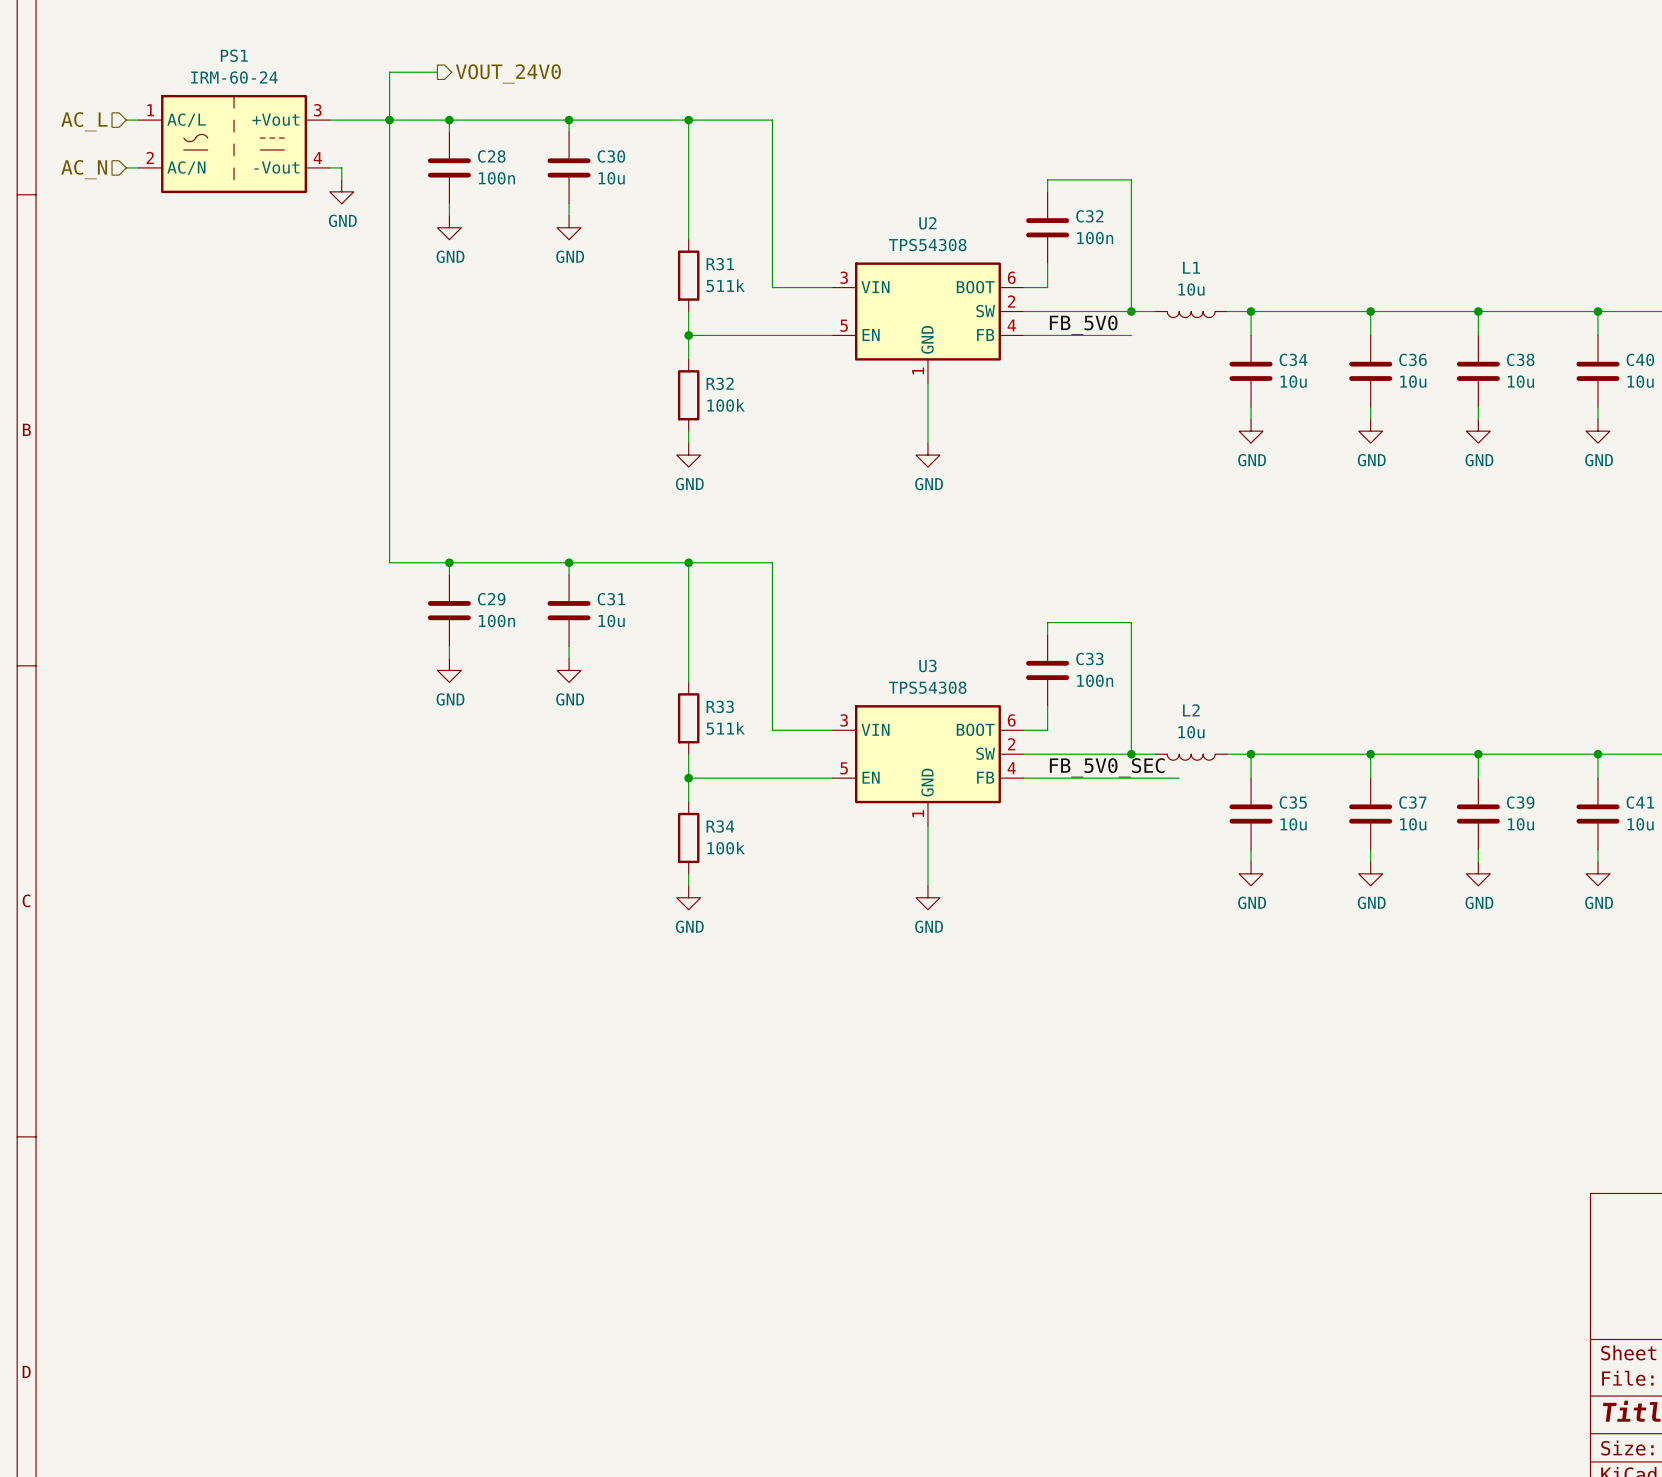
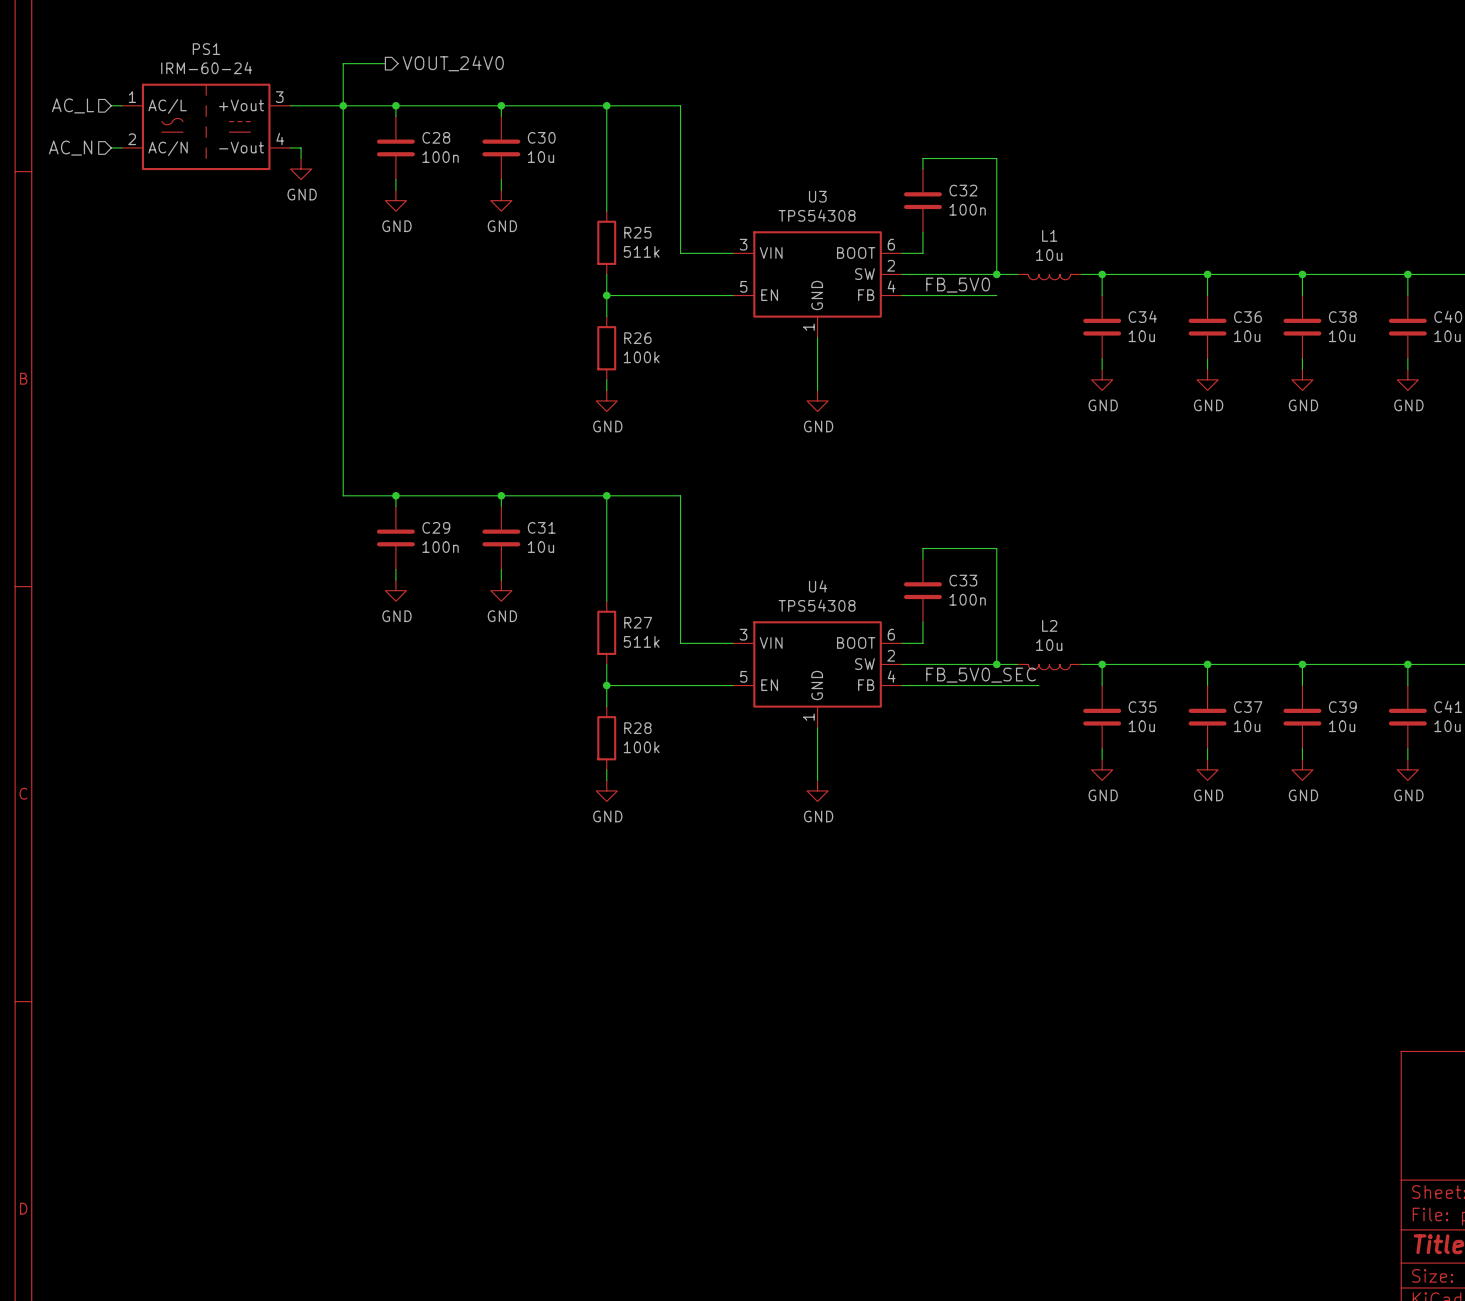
U2 name: U2 (927, 223) -> U3 (817, 196)
R31 name: R31 (720, 264) -> R25 (637, 232)
R32 name: R32 (720, 383) -> R26 (637, 338)
U3 name: U3 (927, 665) -> U4 (818, 586)
R33 name: R33 (720, 706) -> R27 (638, 622)
R34 name: R34 (720, 826) -> R28 (637, 728)

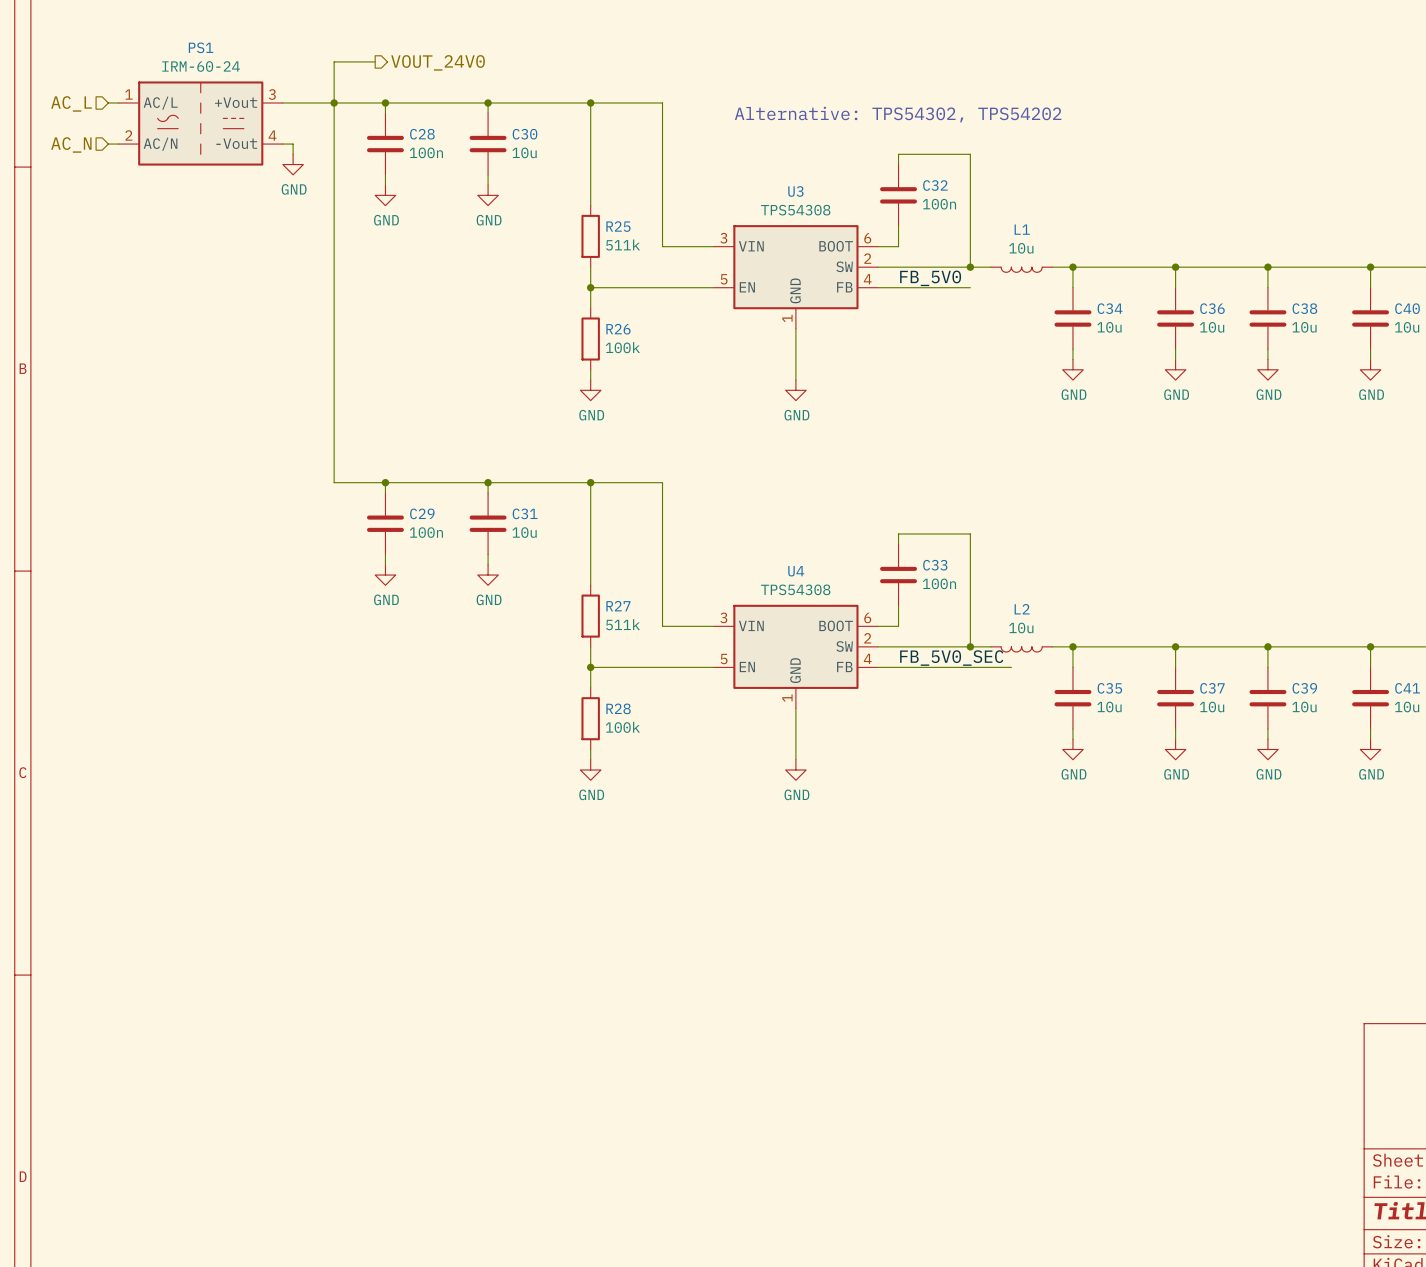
text: none -> Alternative: TPS54302, TPS54202 (898, 114)

